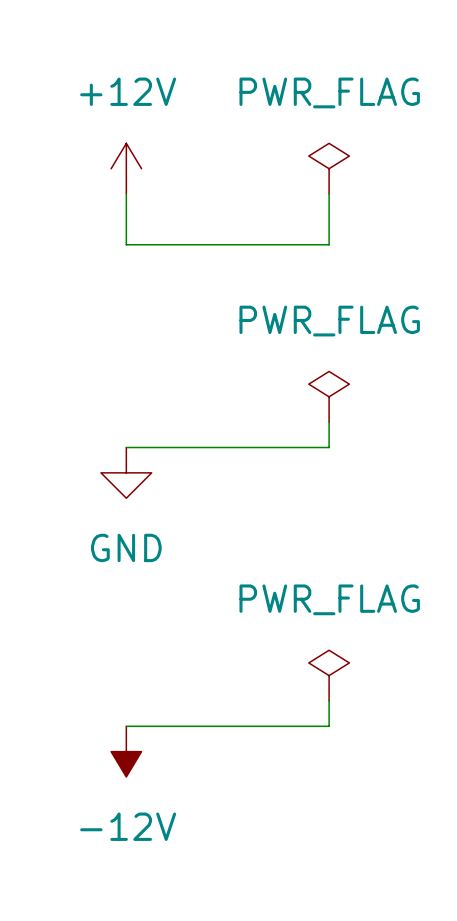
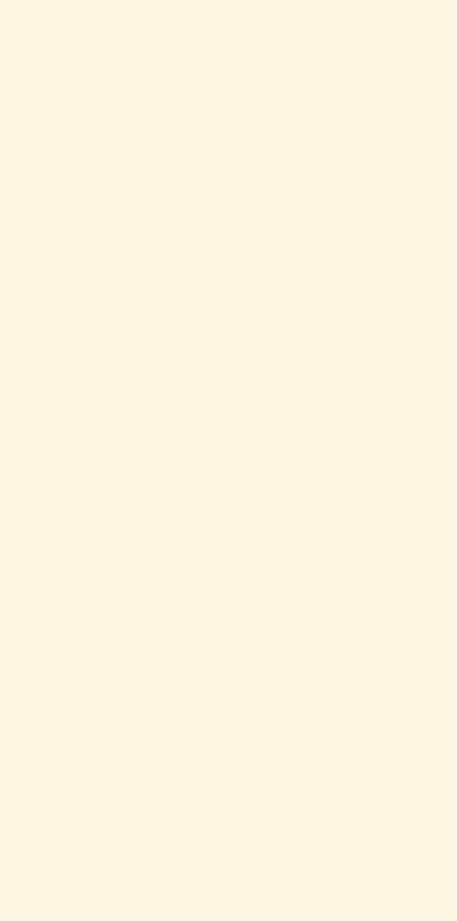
power symbol: +12V (126, 168) -> none
power symbol: PWR_FLAG (329, 168) -> none
wire: (126, 194) (126, 244) (329, 244) (329, 194) -> none
power symbol: PWR_FLAG (329, 396) -> none
wire: (329, 422) (329, 447) (126, 447) -> none
power symbol: GND (126, 472) -> none
power symbol: PWR_FLAG (329, 675) -> none
wire: (329, 700) (329, 726) (126, 726) -> none
power symbol: -12V (126, 751) -> none

